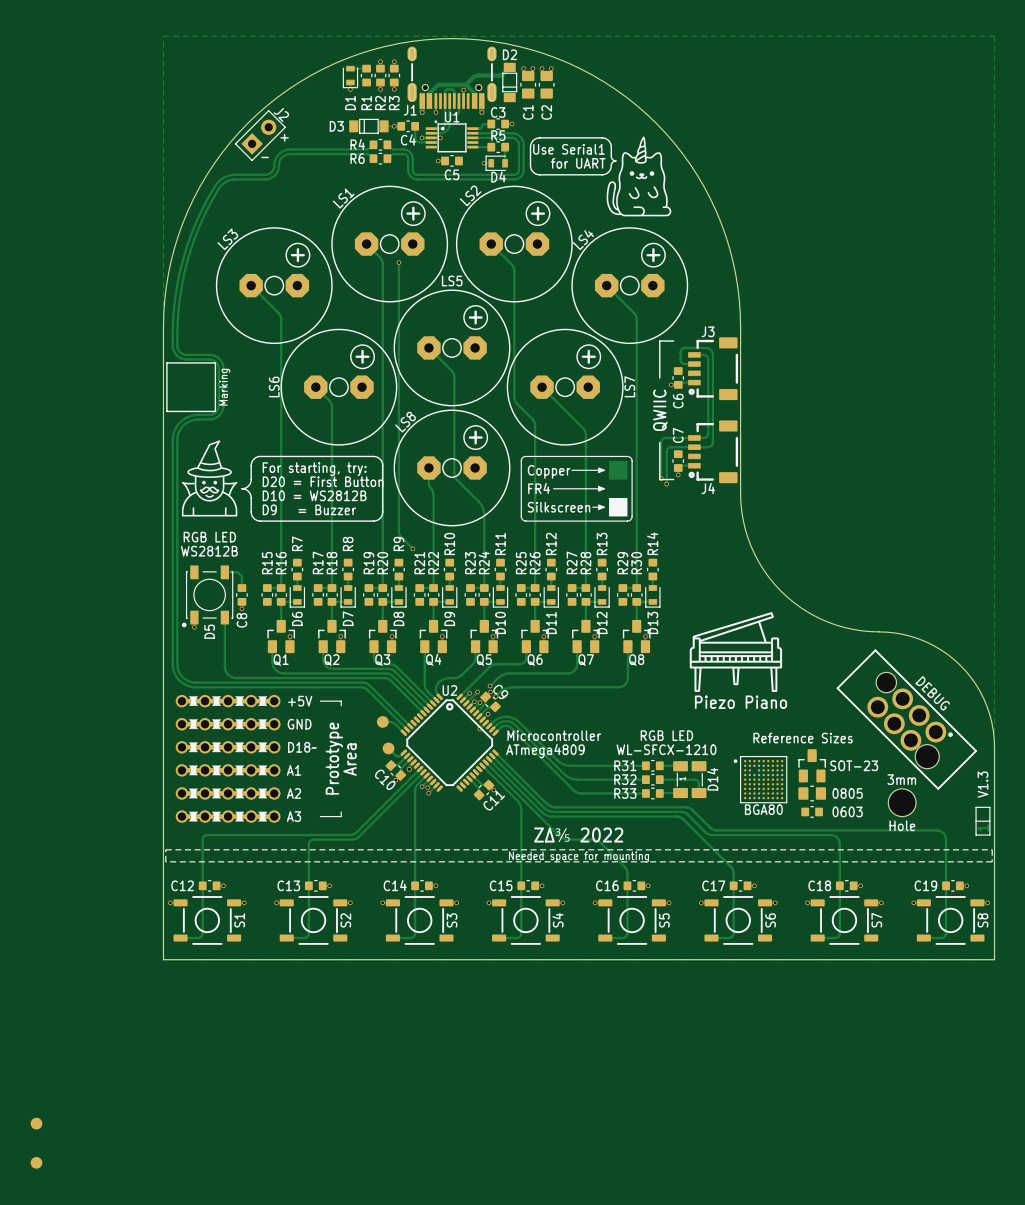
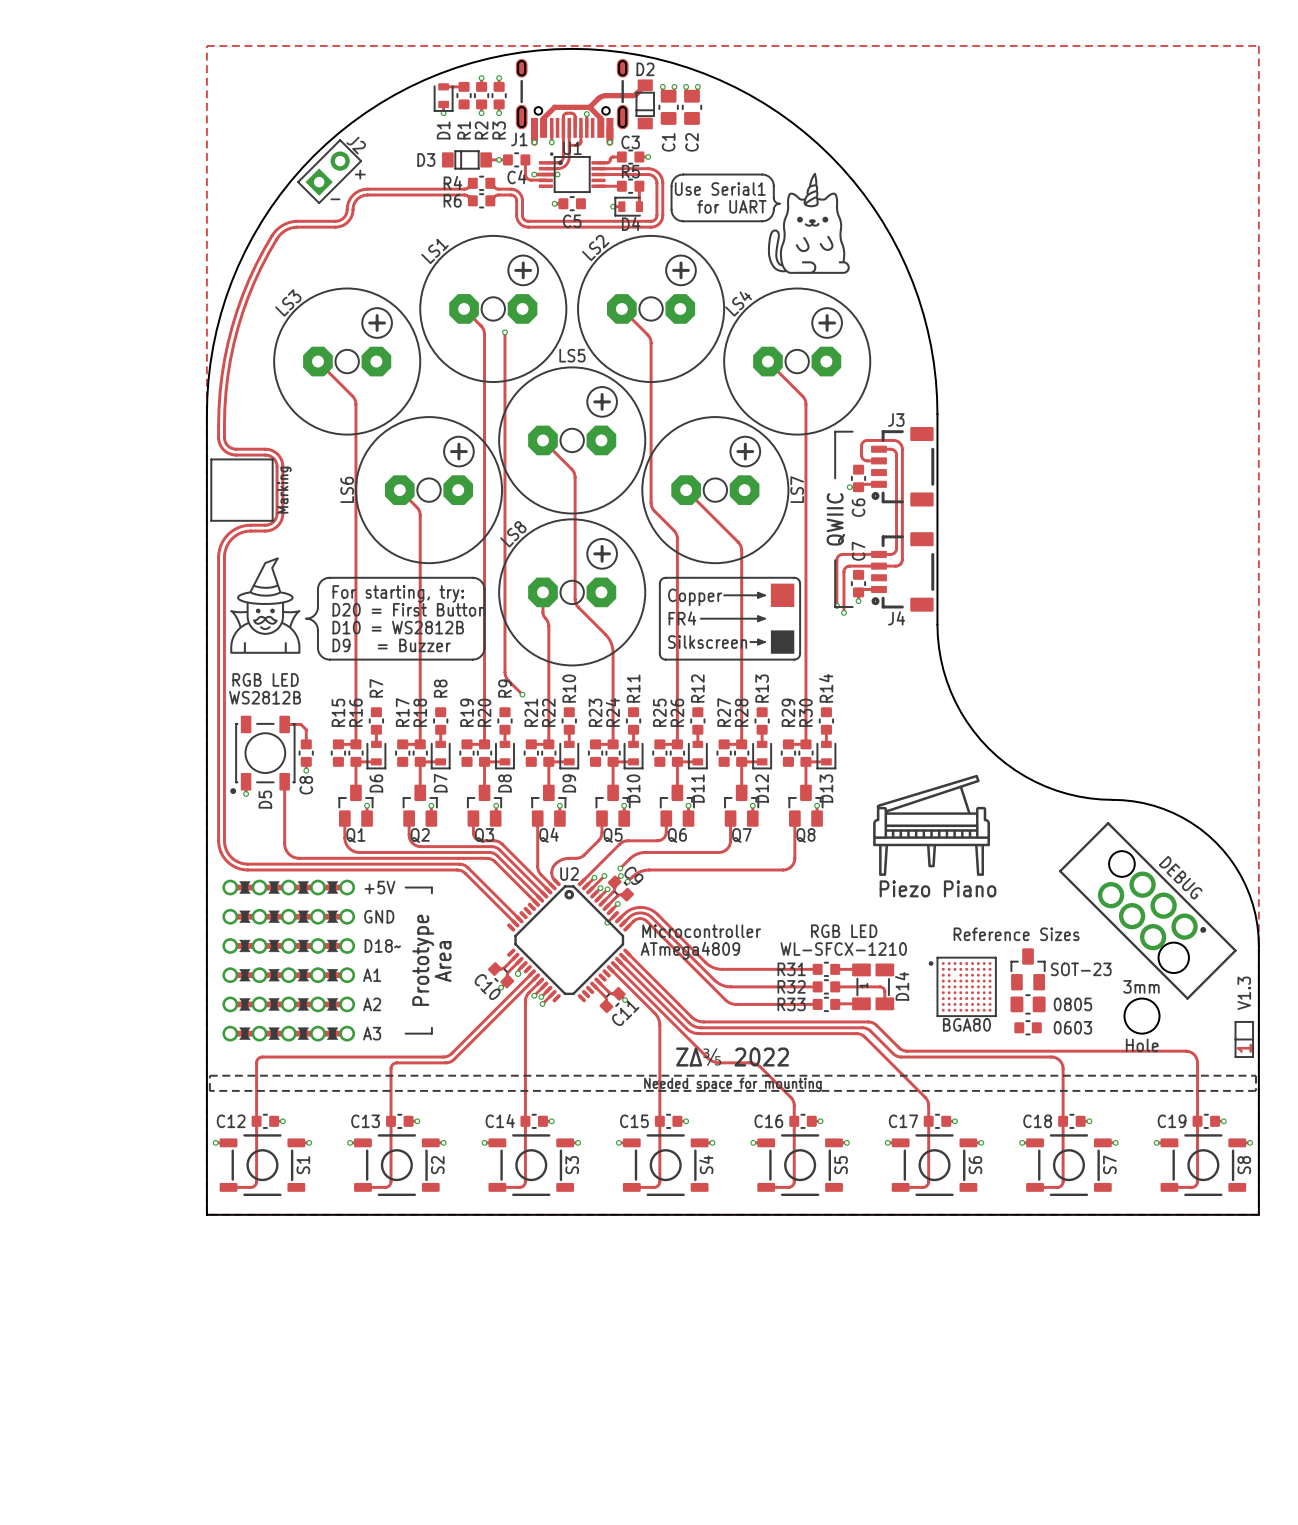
track: (382, 721) (392, 722) (402, 731) -> none
part: (382, 721) -> none
track: (388, 748) (397, 756) (403, 752) -> none
part: (388, 748) -> none
part: (36, 1123) -> none
part: (36, 1162) -> none

